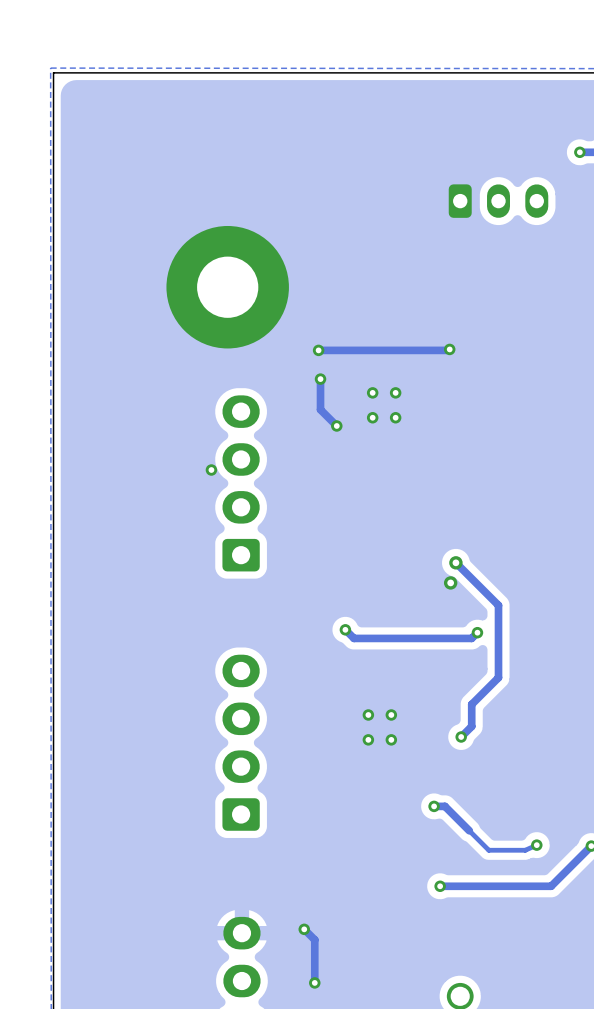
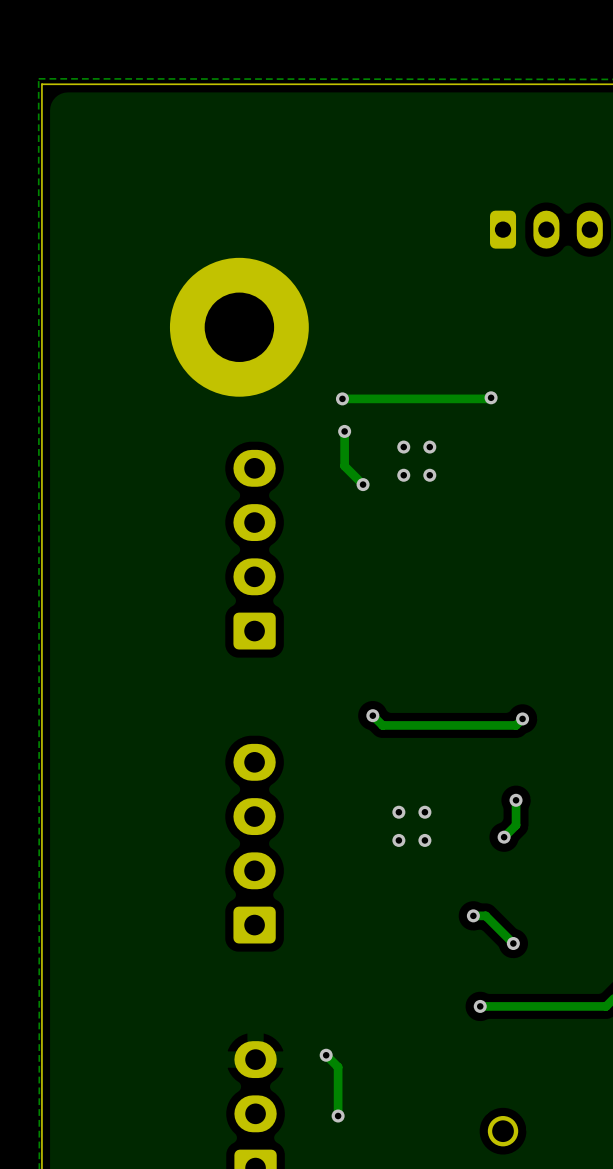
via: (211, 470) -> none
track: (455, 562) (498, 605) (498, 677) (471, 704) -> none
via: (455, 562) -> none
via: (450, 582) -> none
via: none -> (516, 800)
track: (469, 830) (488, 850) (525, 850) (536, 845) -> none
via position: (536, 845) -> (513, 943)

